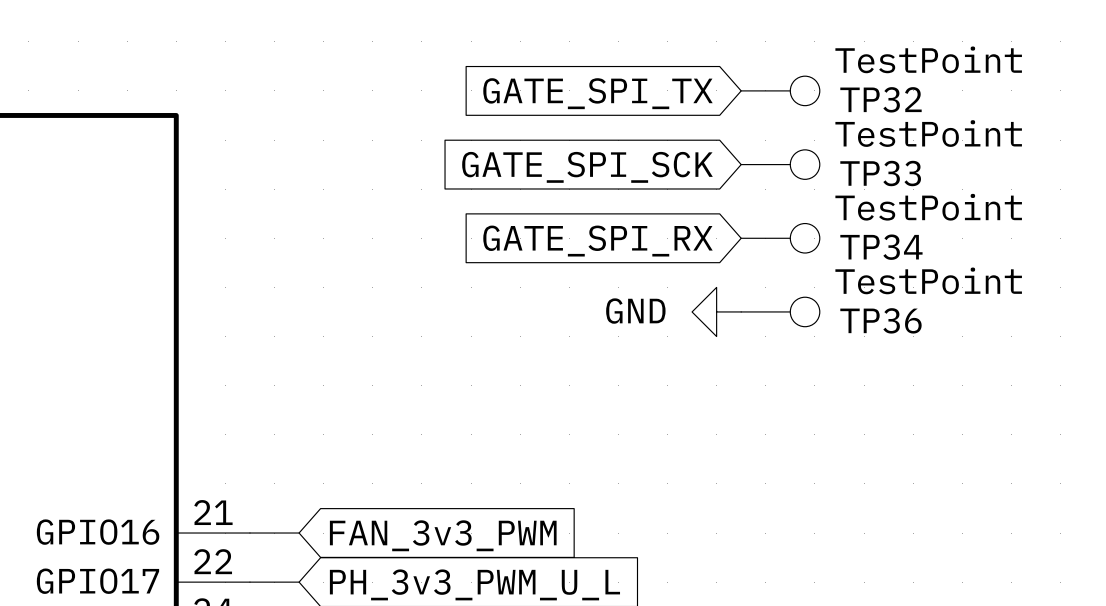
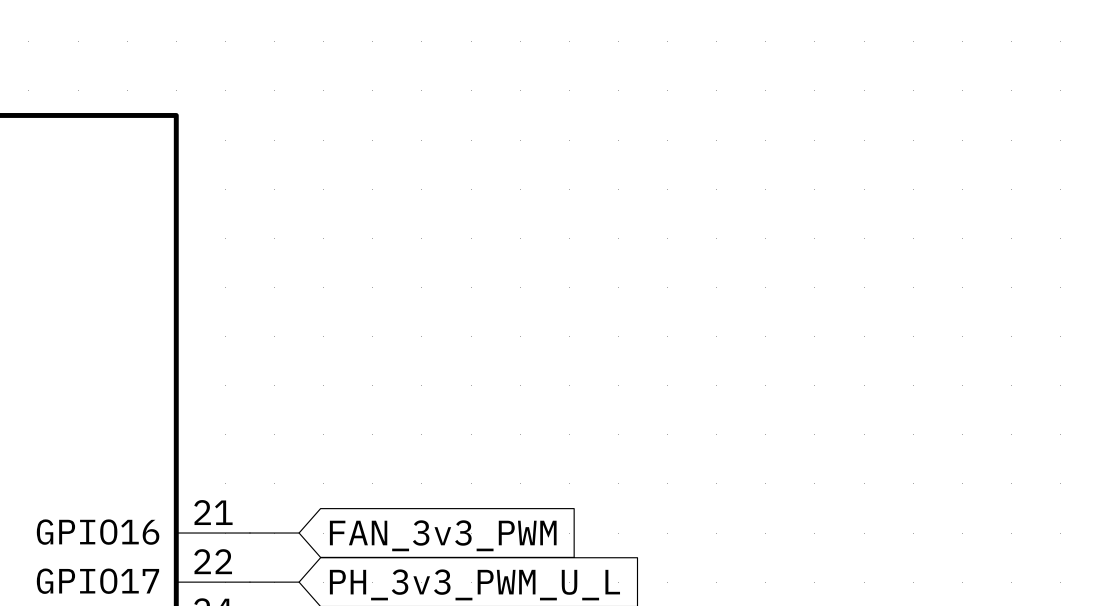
TP32: TestPoint (780, 90) -> none
global label: GATE_SPI_TX (597, 93) -> none
TP33: TestPoint (780, 164) -> none
global label: GATE_SPI_SCK (587, 167) -> none
TP34: TestPoint (780, 238) -> none
global label: GATE_SPI_RX (597, 241) -> none
power symbol: GND (716, 311) -> none
TP36: TestPoint (780, 311) -> none

